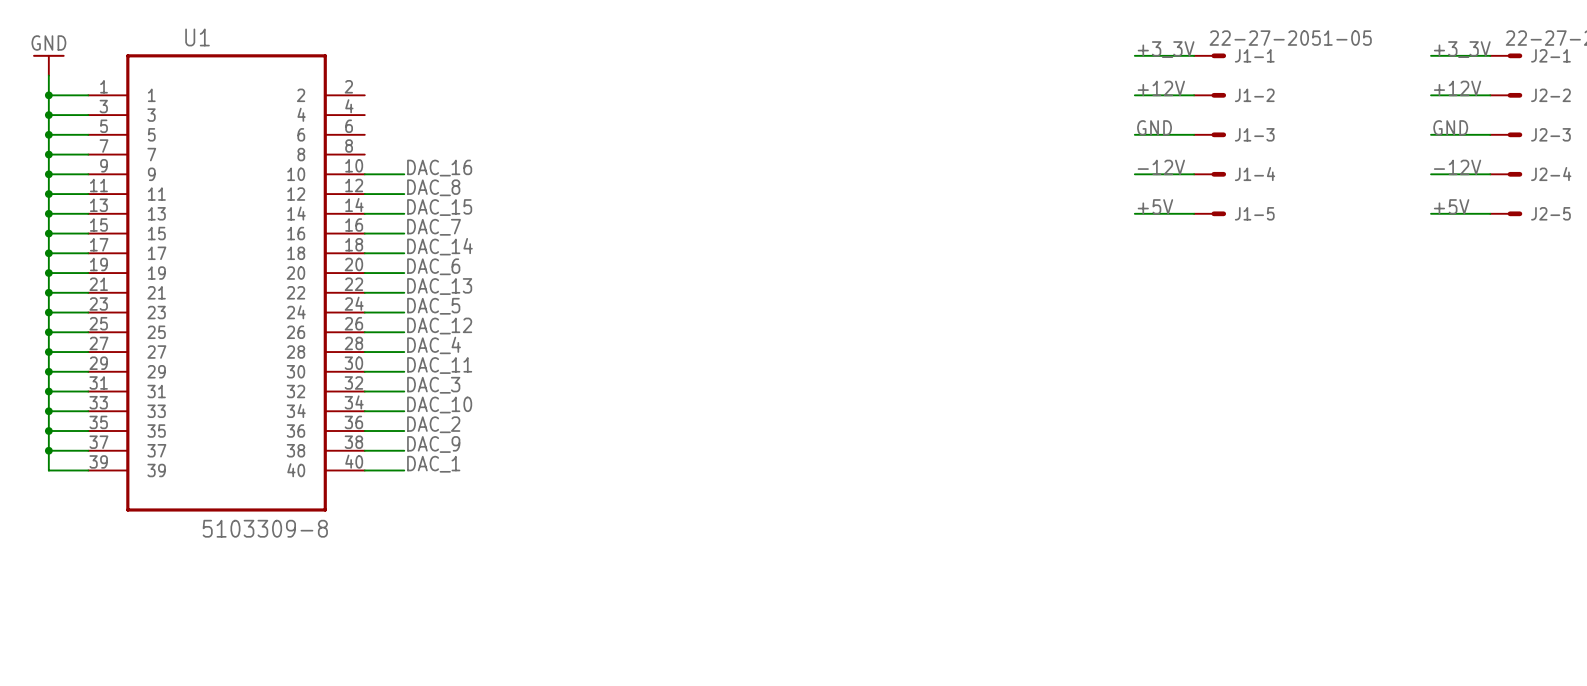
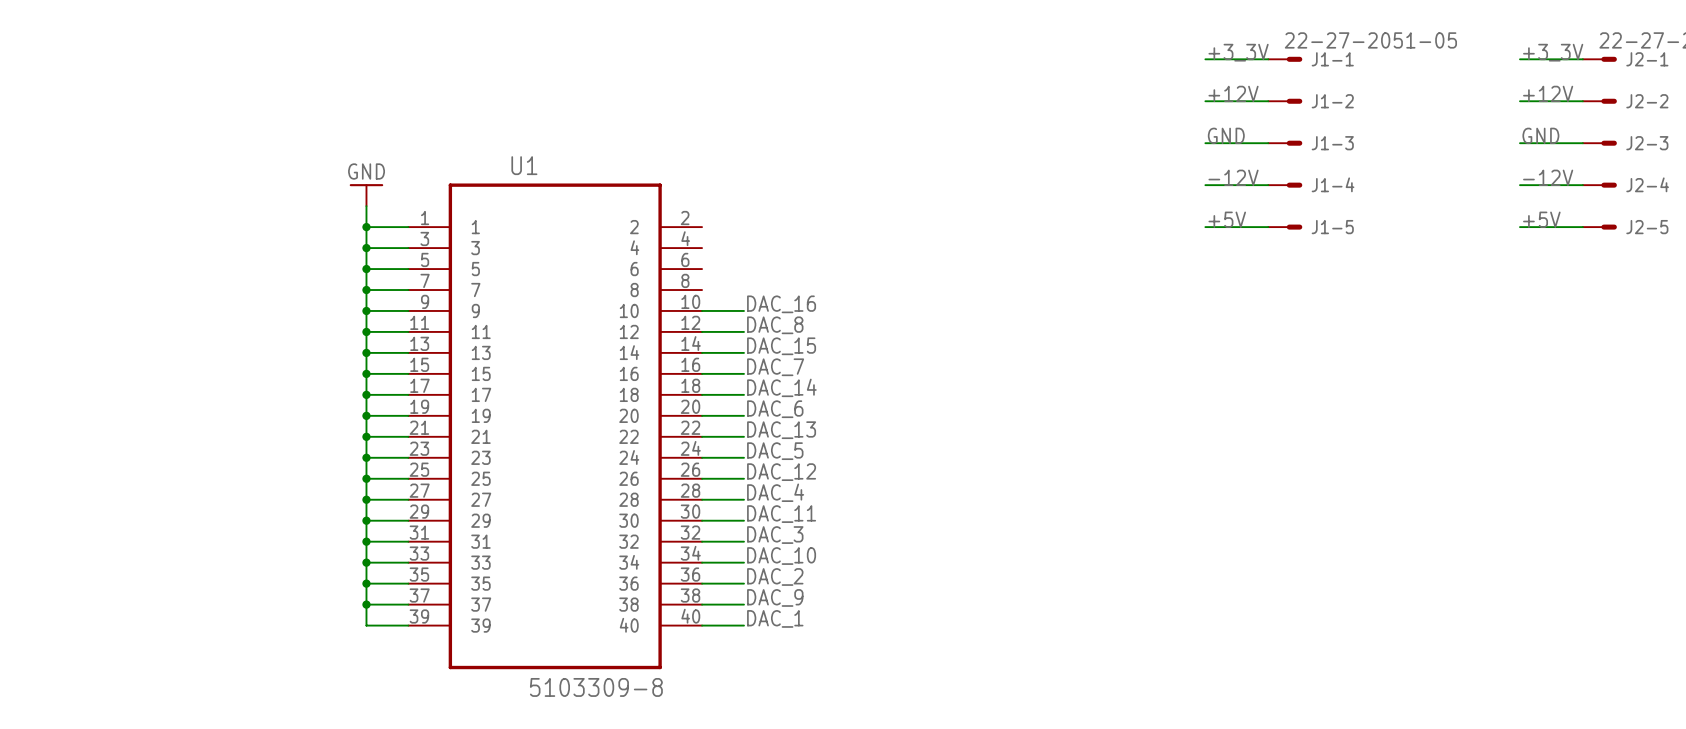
power symbol: GND (48, 65) -> none
wire: (48, 75) (48, 470) (88, 470) -> none
wire: (48, 95) (88, 95) -> none
junction: (48, 95) -> none
wire: (48, 115) (88, 115) -> none
junction: (48, 115) -> none
wire: (48, 134) (88, 134) -> none
junction: (48, 134) -> none
wire: (48, 154) (88, 154) -> none
junction: (48, 154) -> none
label: DAC_16 (439, 168) -> none
wire: (48, 174) (88, 174) -> none
junction: (48, 174) -> none
wire: (364, 174) (404, 174) -> none
power symbol: none -> GND (366, 195)
label: DAC_8 (433, 187) -> none
wire: (48, 194) (88, 194) -> none
junction: (48, 194) -> none
wire: none -> (366, 206) (366, 625) (408, 625)
wire: (364, 194) (404, 194) -> none
label: DAC_15 (439, 207) -> none
wire: (48, 213) (88, 213) -> none
junction: (48, 213) -> none
junction: none -> (366, 227)
label: DAC_7 (434, 227) -> none
wire: (48, 233) (88, 233) -> none
junction: (48, 233) -> none
junction: none -> (366, 248)
label: DAC_14 (439, 246) -> none
wire: (48, 253) (88, 253) -> none
junction: (48, 253) -> none
junction: none -> (366, 269)
label: DAC_6 (433, 266) -> none
wire: (48, 273) (88, 273) -> none
junction: (48, 273) -> none
junction: none -> (366, 290)
U1 position: (226, 282) -> (555, 426)
label: DAC_13 (439, 286) -> none
label: none -> DAC_16 (781, 304)
wire: (48, 292) (88, 292) -> none
junction: (48, 292) -> none
junction: none -> (366, 310)
wire: none -> (702, 310) (743, 310)
label: DAC_5 (433, 306) -> none
label: none -> DAC_8 (775, 325)
wire: (48, 312) (88, 312) -> none
junction: (48, 312) -> none
junction: none -> (366, 331)
wire: none -> (702, 331) (743, 331)
label: DAC_12 (439, 326) -> none
label: none -> DAC_15 (781, 346)
wire: (48, 332) (88, 332) -> none
junction: (48, 332) -> none
junction: none -> (366, 352)
wire: none -> (702, 352) (743, 352)
label: DAC_4 (434, 345) -> none
label: none -> DAC_7 (775, 367)
wire: (48, 352) (88, 352) -> none
junction: (48, 352) -> none
junction: none -> (366, 373)
wire: none -> (702, 373) (743, 373)
label: DAC_11 (439, 365) -> none
label: none -> DAC_14 (781, 387)
wire: (48, 371) (88, 371) -> none
junction: (48, 371) -> none
junction: none -> (366, 394)
wire: none -> (702, 394) (743, 394)
label: DAC_3 (433, 385) -> none
label: none -> DAC_6 (775, 409)
wire: (48, 391) (88, 391) -> none
junction: (48, 391) -> none
junction: none -> (366, 415)
wire: none -> (702, 415) (743, 415)
label: DAC_10 (439, 405) -> none
label: none -> DAC_13 (781, 430)
wire: (48, 411) (88, 411) -> none
junction: (48, 411) -> none
junction: none -> (366, 436)
wire: none -> (702, 436) (743, 436)
label: DAC_2 (433, 424) -> none
label: none -> DAC_5 (775, 451)
wire: (48, 431) (88, 431) -> none
junction: (48, 431) -> none
junction: none -> (366, 457)
wire: none -> (702, 457) (743, 457)
label: DAC_9 (433, 444) -> none
label: none -> DAC_12 (781, 472)
wire: (48, 450) (88, 450) -> none
junction: (48, 450) -> none
junction: none -> (366, 478)
wire: none -> (702, 478) (743, 478)
label: none -> DAC_4 (775, 492)
label: DAC_1 (433, 464) -> none
junction: none -> (366, 499)
wire: none -> (702, 499) (743, 499)
label: none -> DAC_11 (781, 514)
wire: none -> (366, 520) (408, 520)
junction: none -> (366, 520)
wire: none -> (702, 520) (743, 520)
label: none -> DAC_3 (775, 535)
wire: none -> (366, 541) (408, 541)
junction: none -> (366, 541)
wire: none -> (702, 541) (743, 541)
label: none -> DAC_10 (781, 556)
wire: none -> (366, 562) (408, 562)
junction: none -> (366, 562)
wire: none -> (702, 562) (743, 562)
label: none -> DAC_2 (775, 576)
wire: none -> (366, 583) (408, 583)
junction: none -> (366, 583)
wire: none -> (702, 583) (743, 583)
label: none -> DAC_9 (775, 597)
wire: none -> (366, 604) (408, 604)
junction: none -> (366, 604)
wire: none -> (702, 604) (743, 604)
label: none -> DAC_1 (775, 618)
wire: none -> (702, 625) (743, 625)

